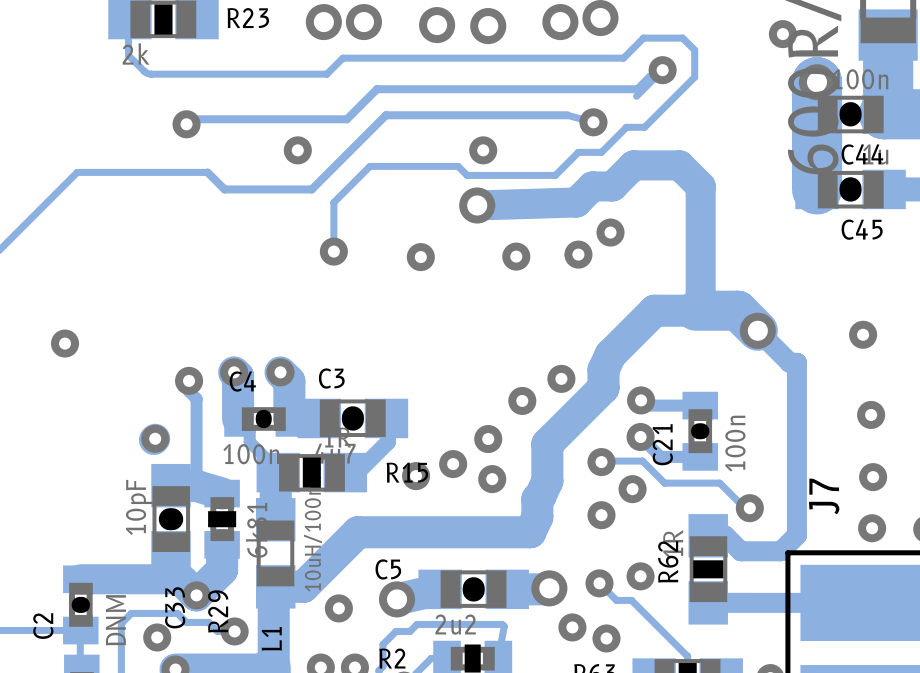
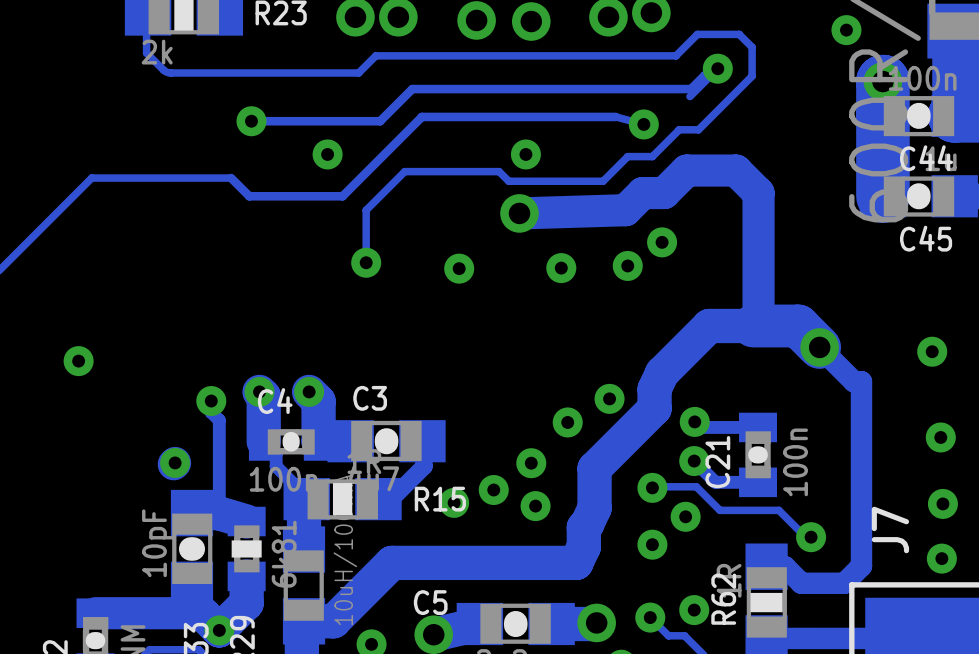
track: (226, 119) (191, 119) (186, 124) -> none
via position: (186, 124) -> (251, 121)

